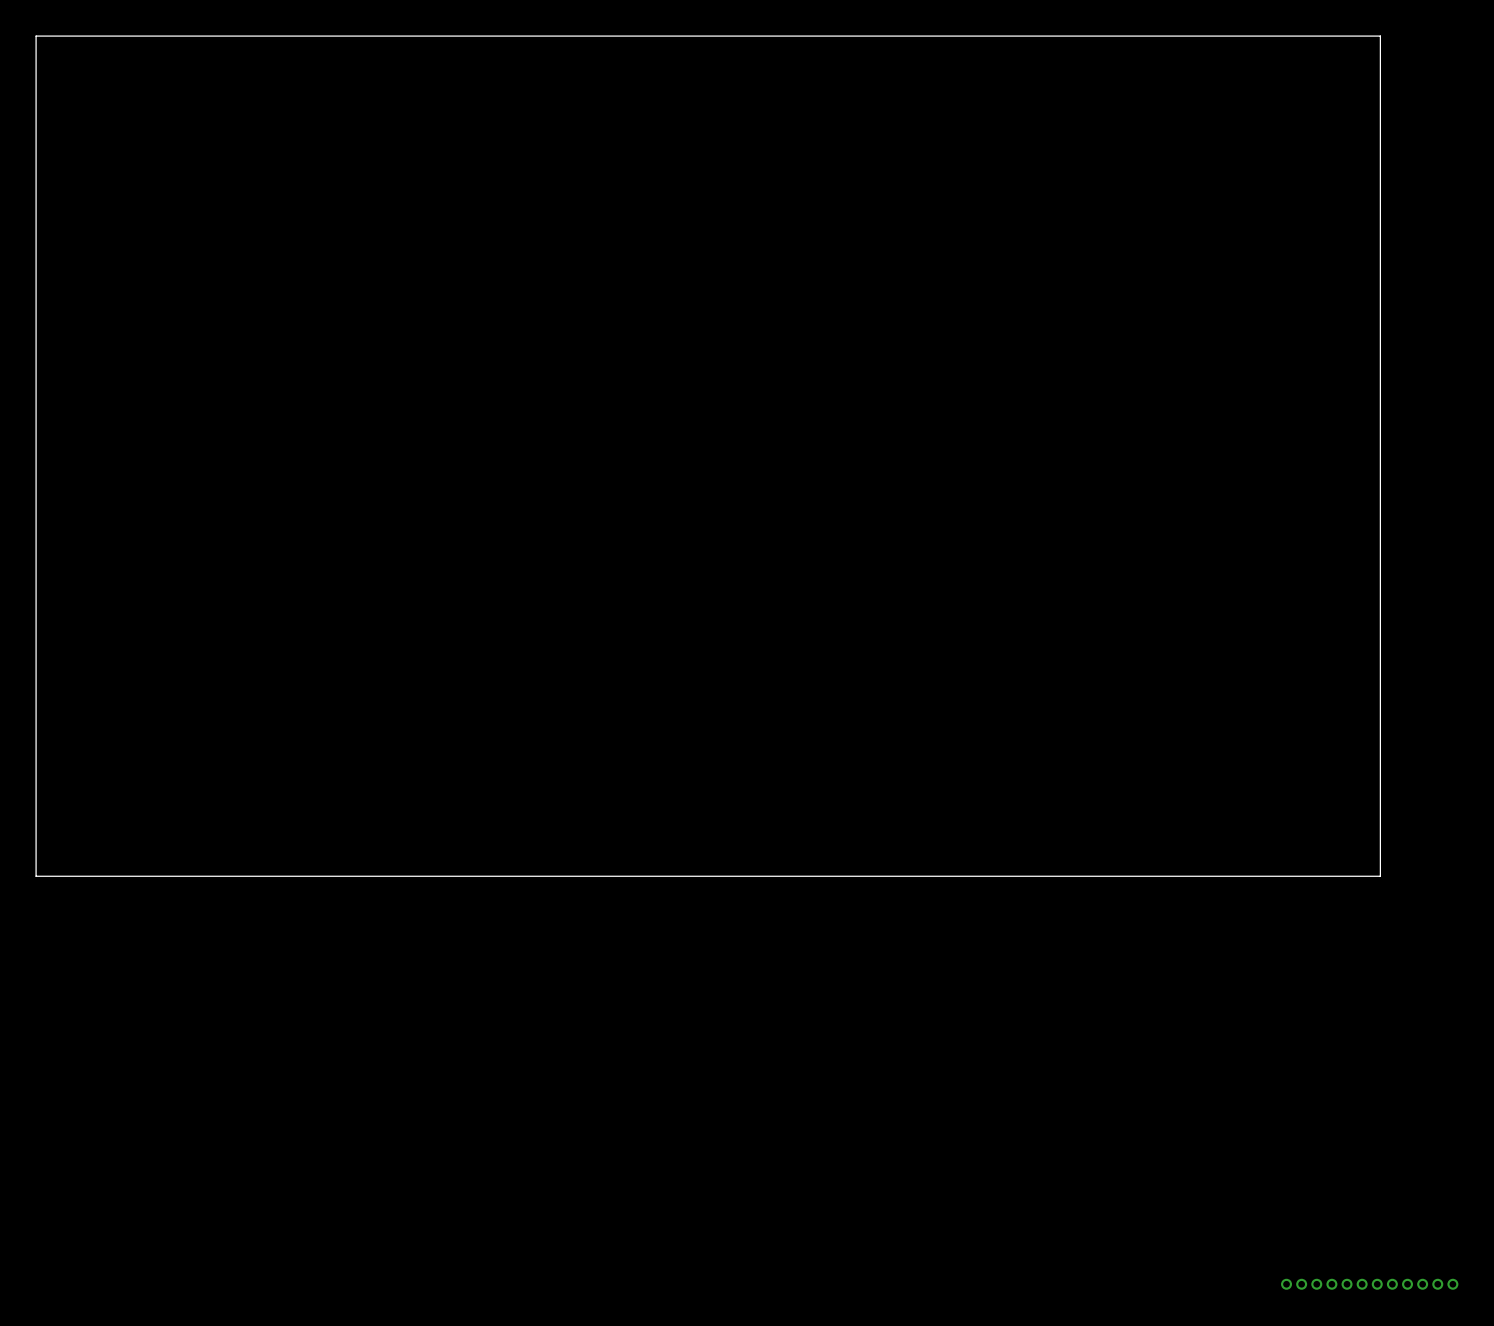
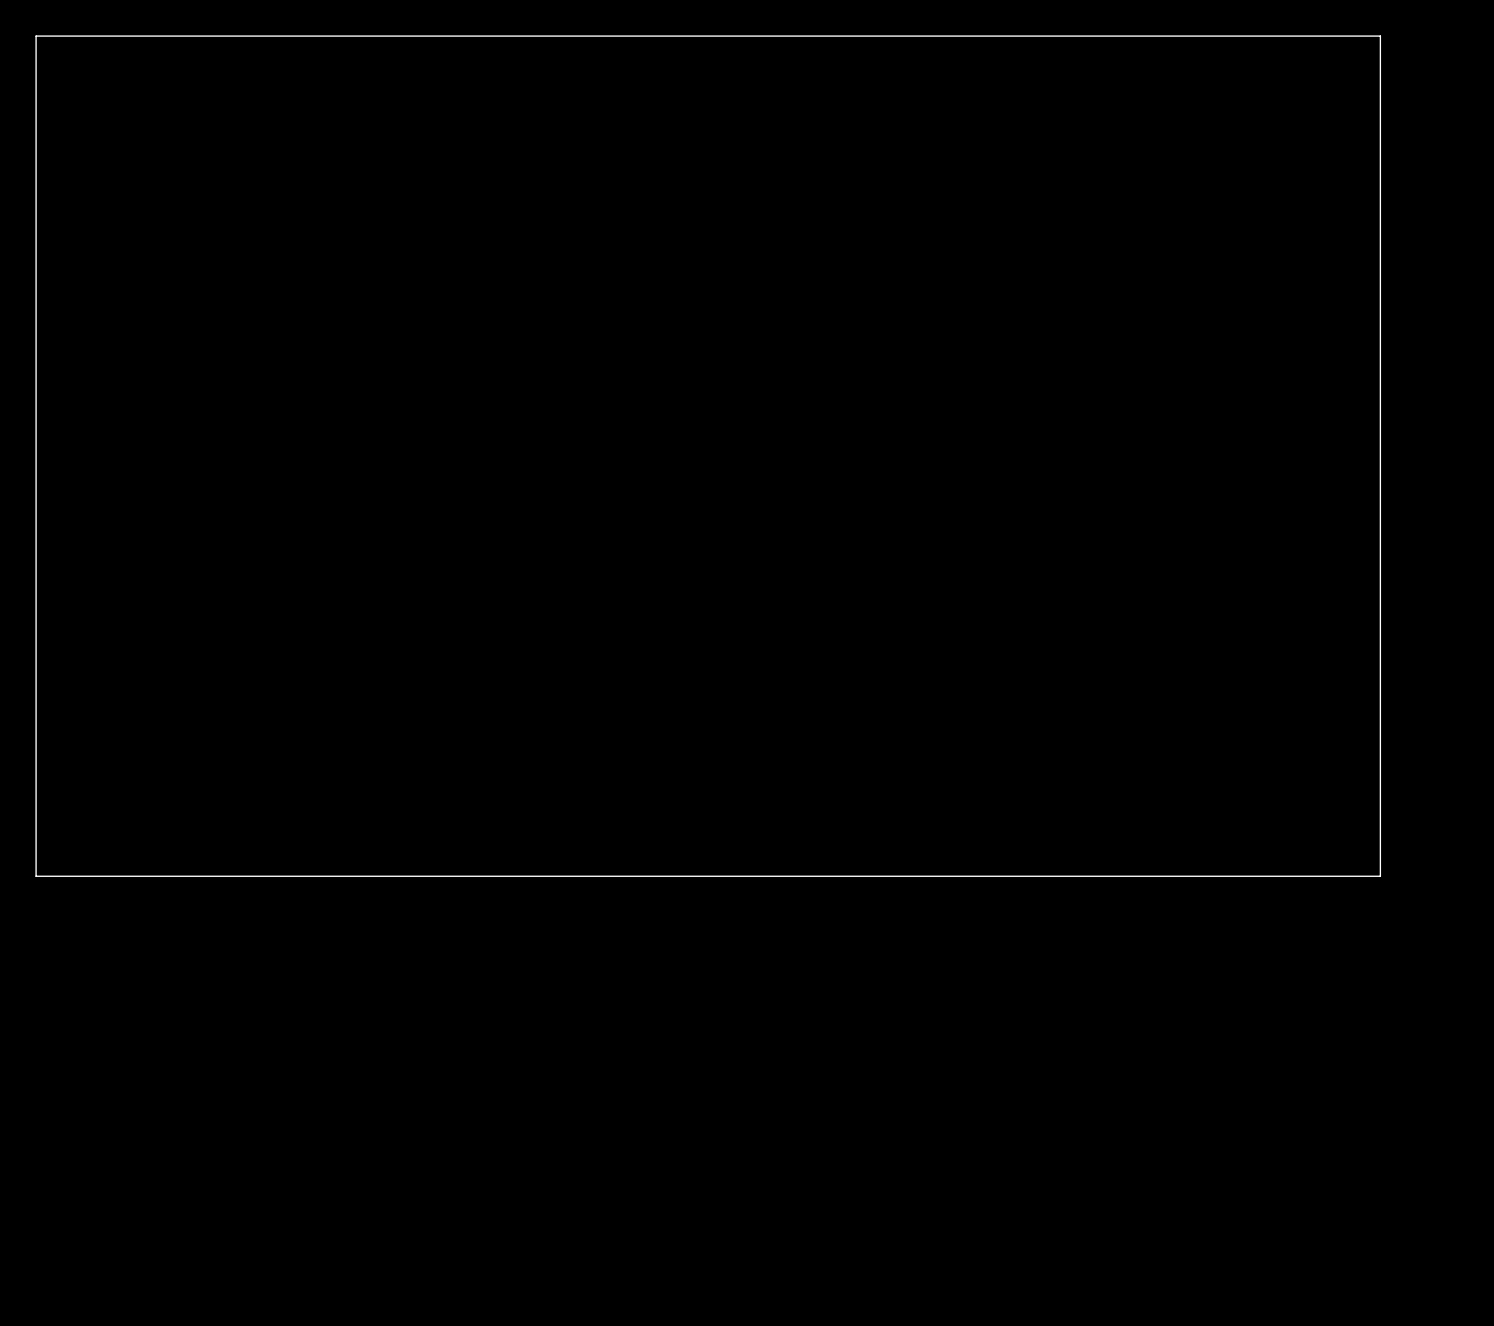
part: (1369, 1284) -> none

